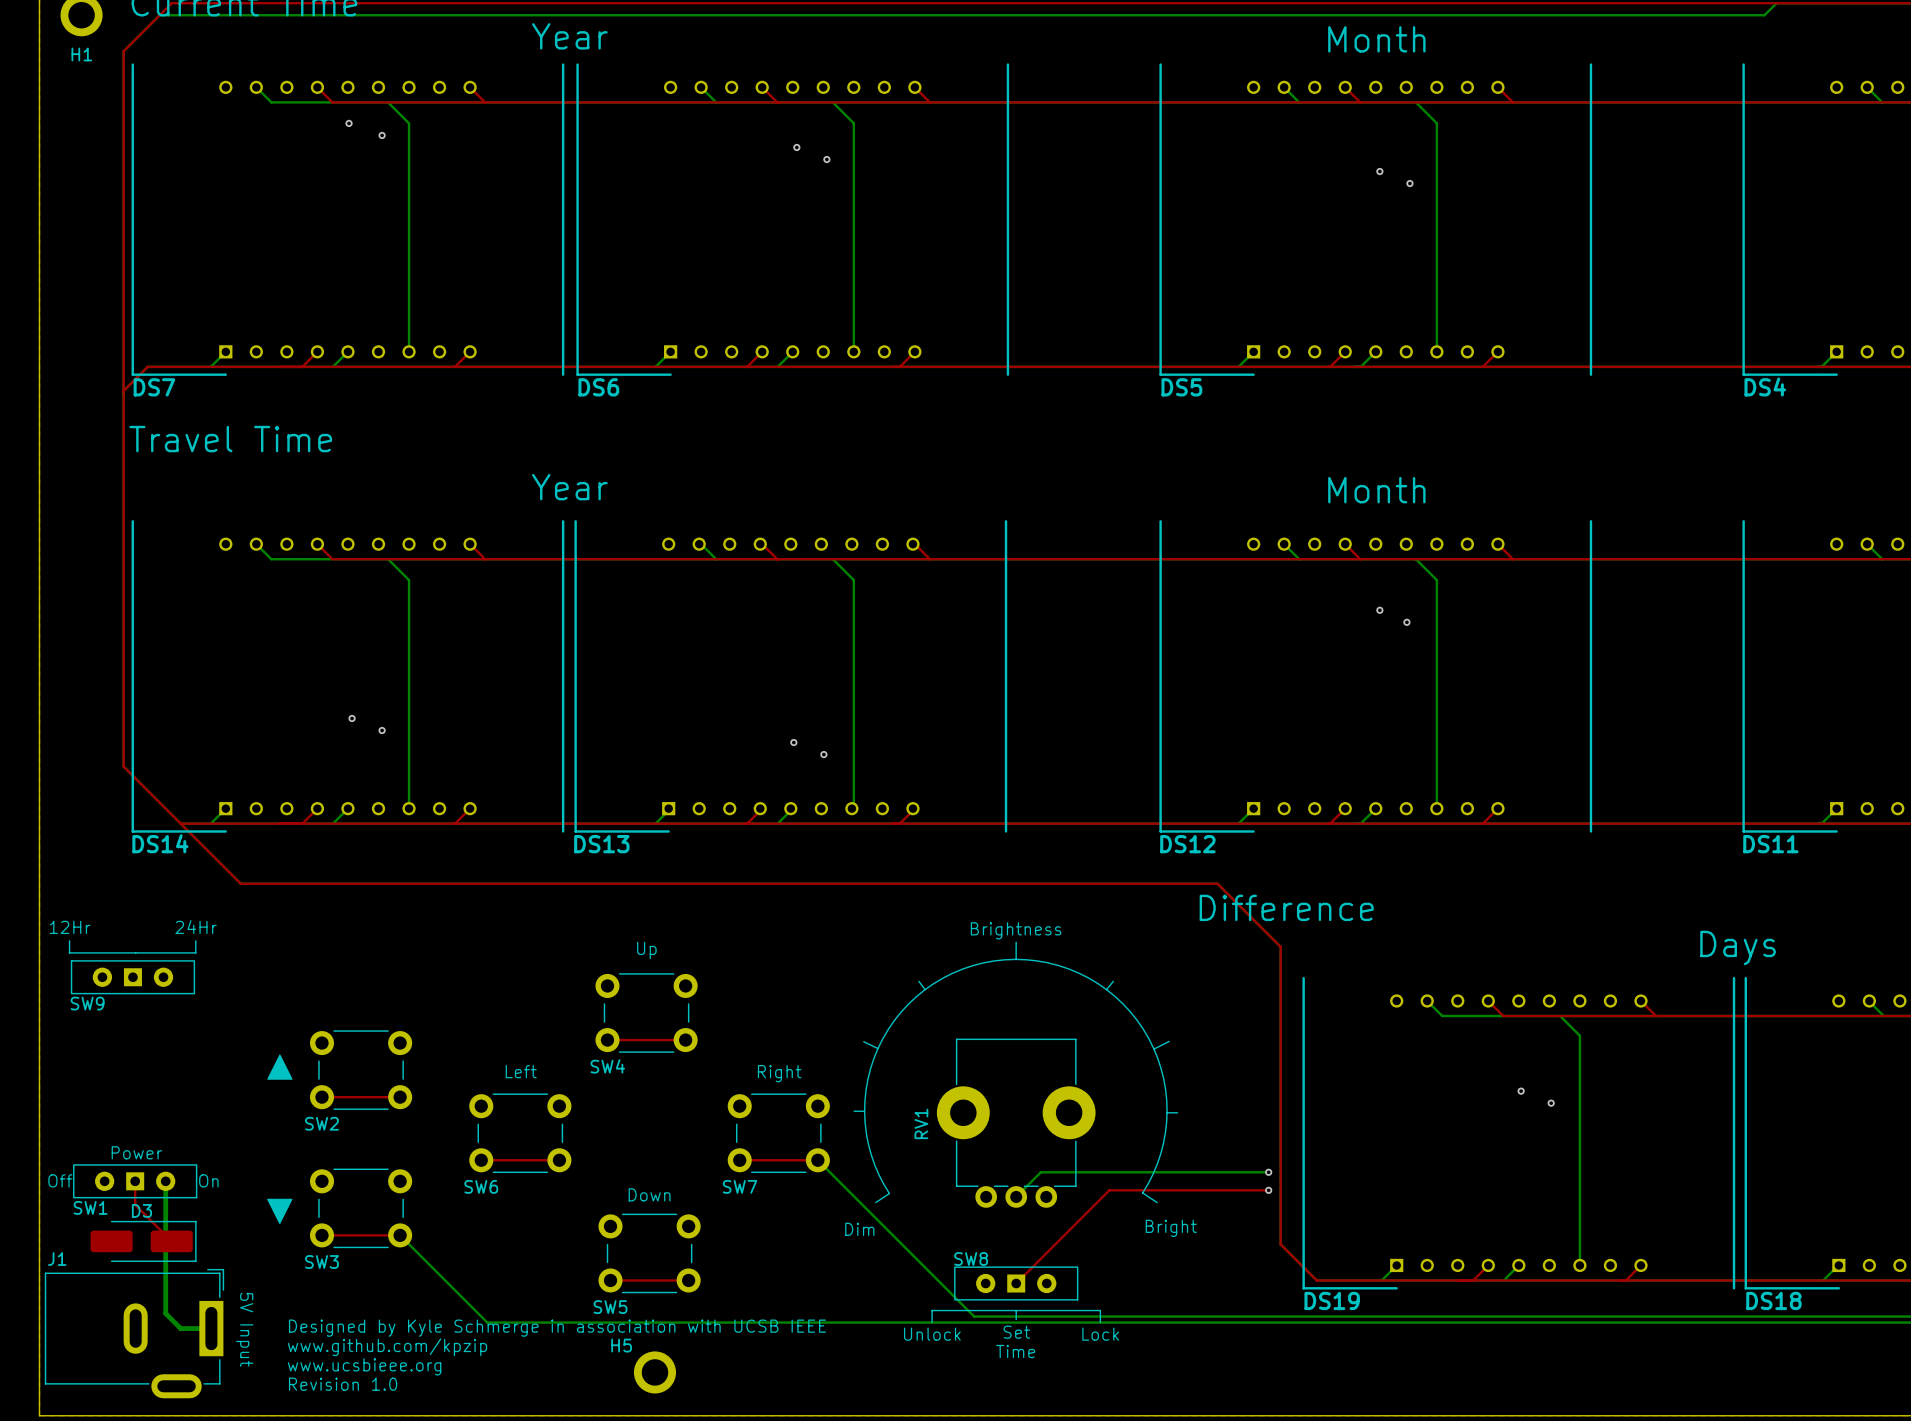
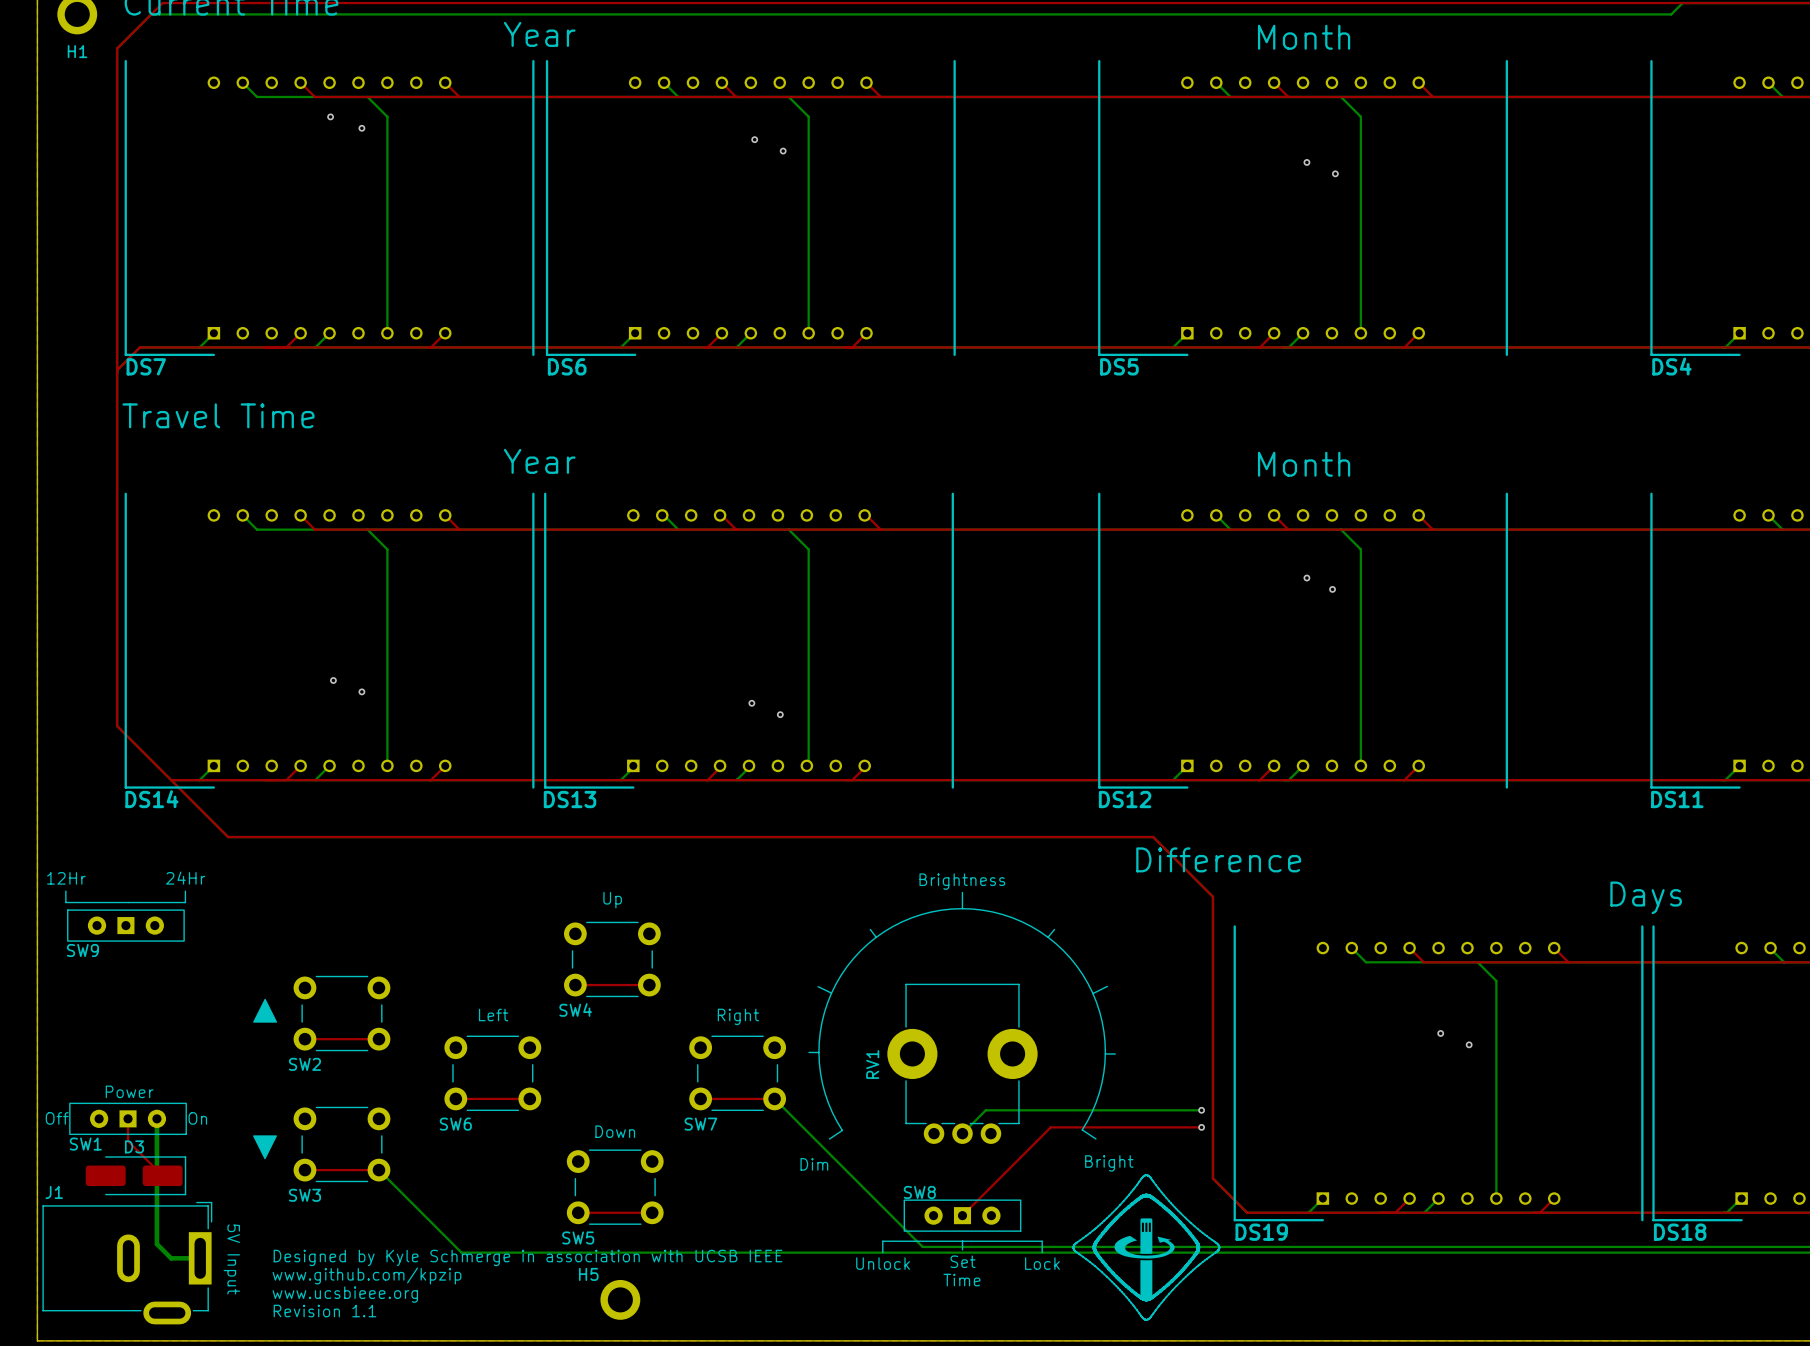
drawing: none -> [1072, 1174, 1221, 1321]
text: Revision 1.0 (343, 1384) -> Revision 1.1 (324, 1311)

